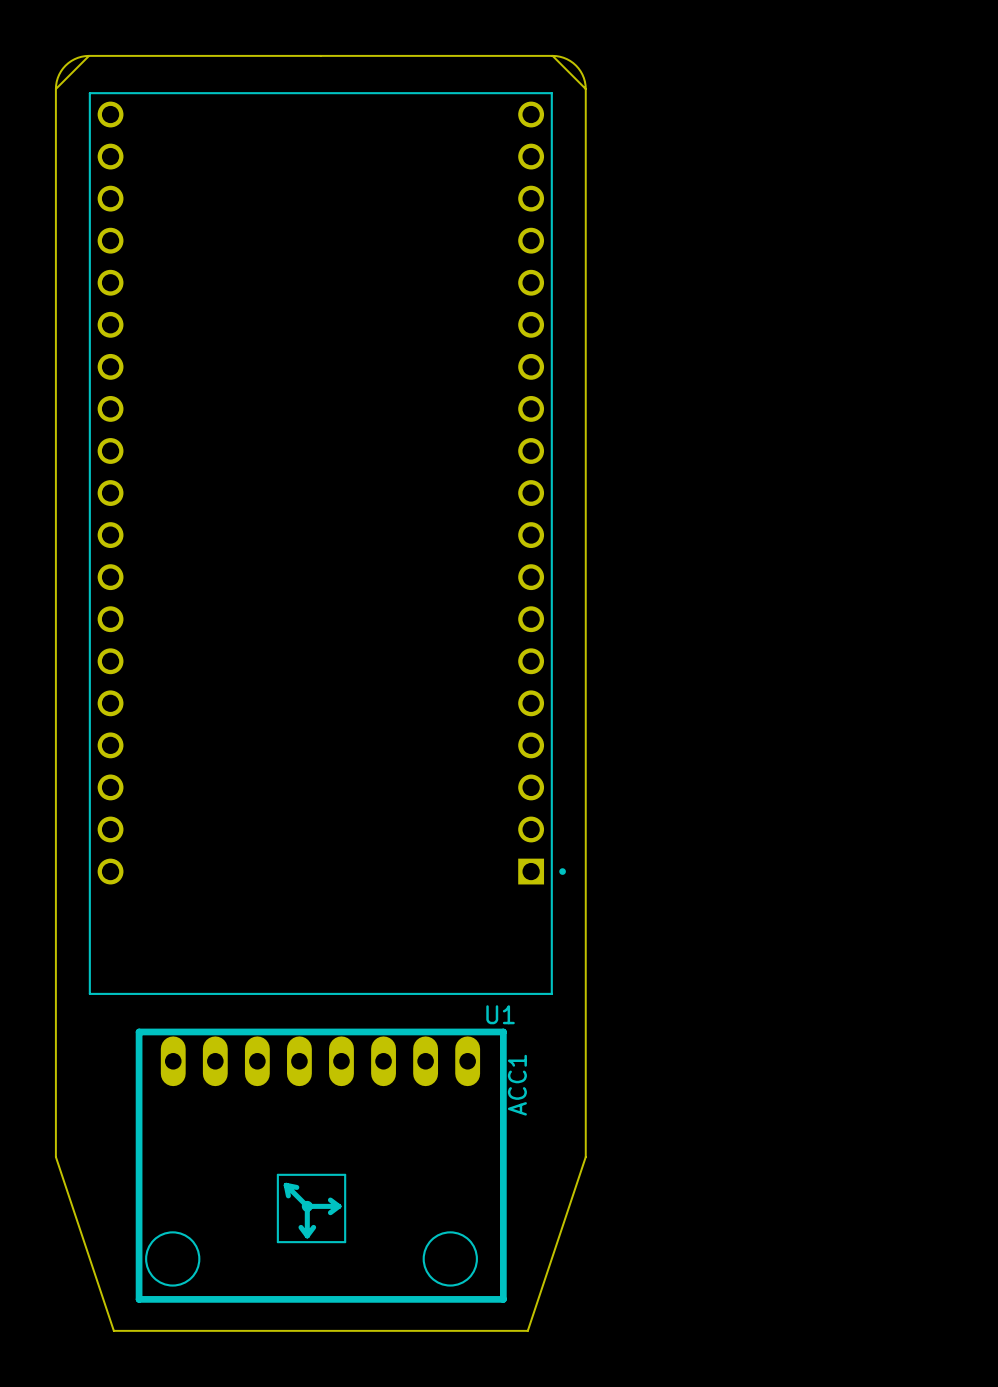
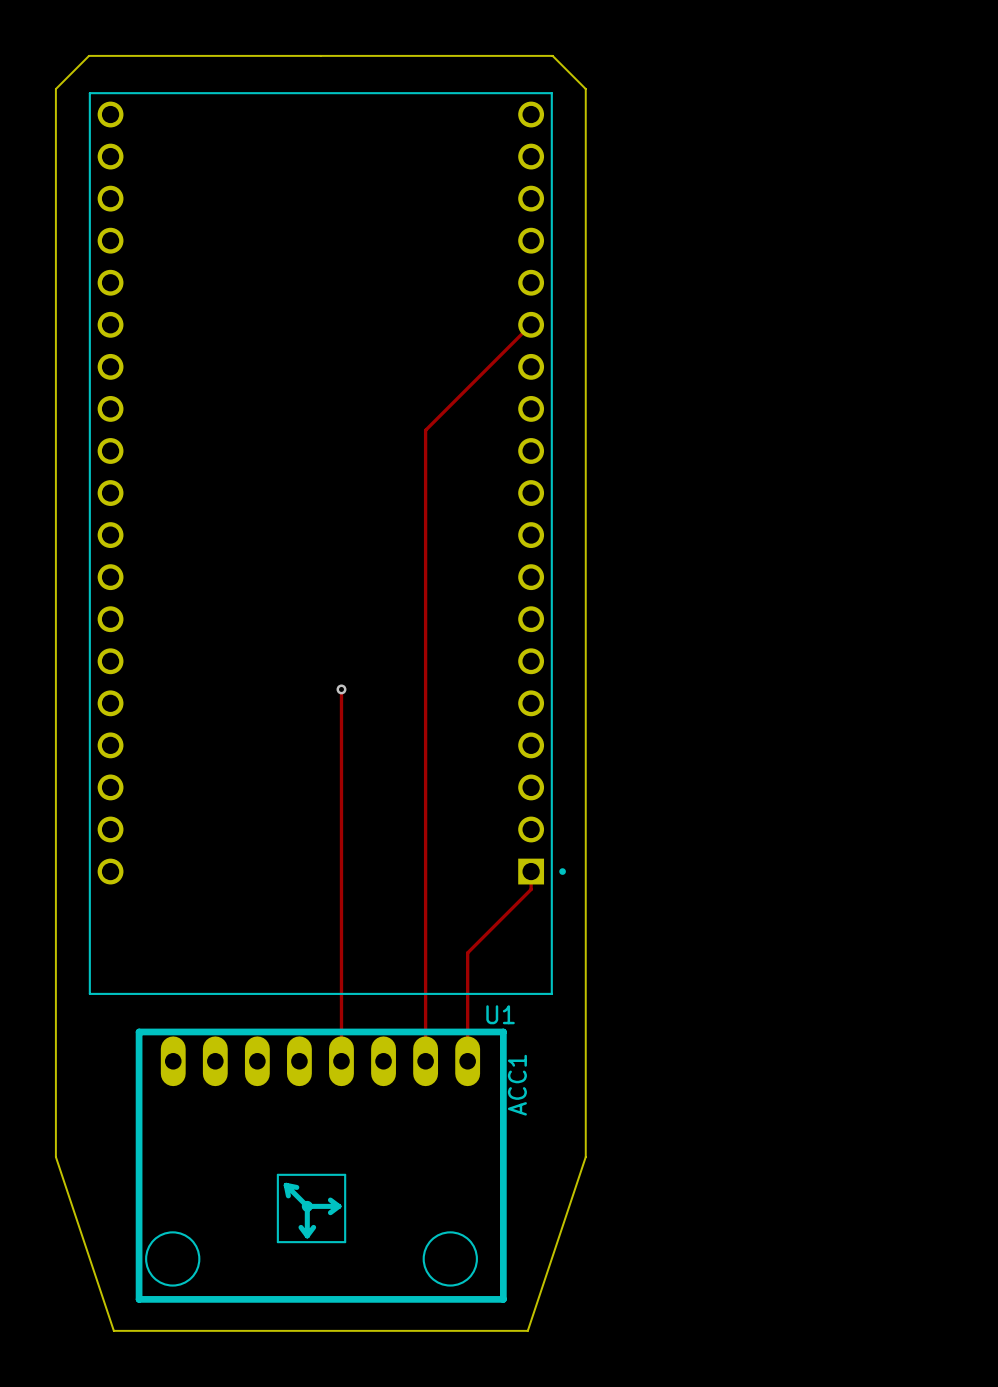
board edge: (89, 55) (78, 57) (65, 65) (57, 78) (55, 89) -> none
board edge: (552, 55) (567, 59) (576, 65) (582, 74) (585, 89) -> none
track: none -> (531, 324) (425, 430) (425, 1061)
track: none -> (341, 689) (341, 1061)
via: none -> (341, 689)
track: none -> (531, 871) (531, 889) (467, 952) (467, 1061)

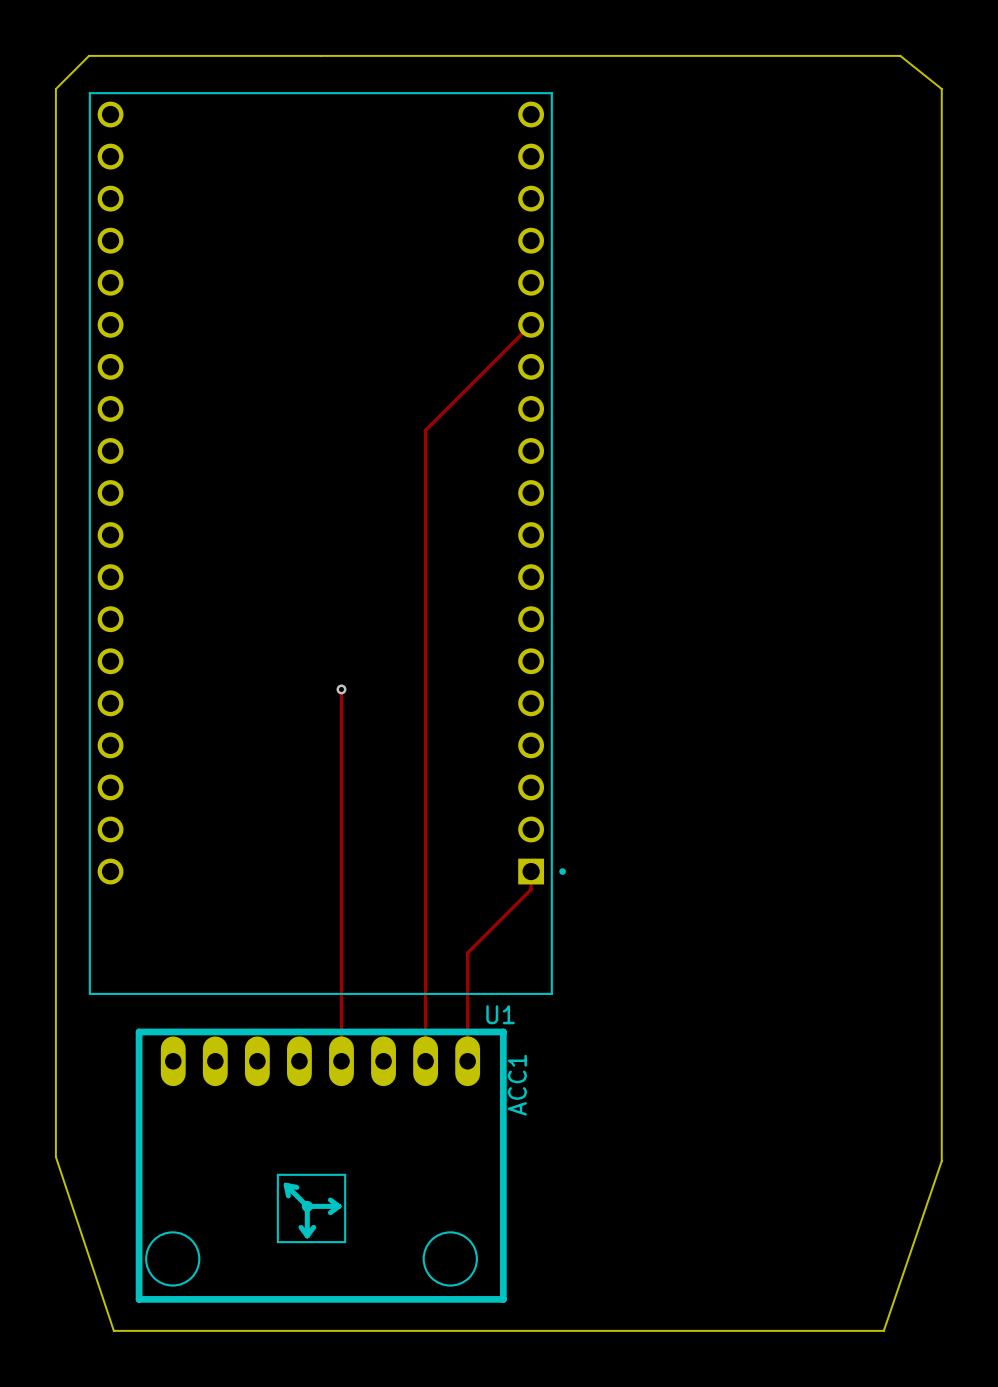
board edge: (552, 55) (585, 89) (585, 1157) (527, 1330) -> (552, 55) (900, 55) (941, 89) (941, 1161) (883, 1330) (527, 1330)

